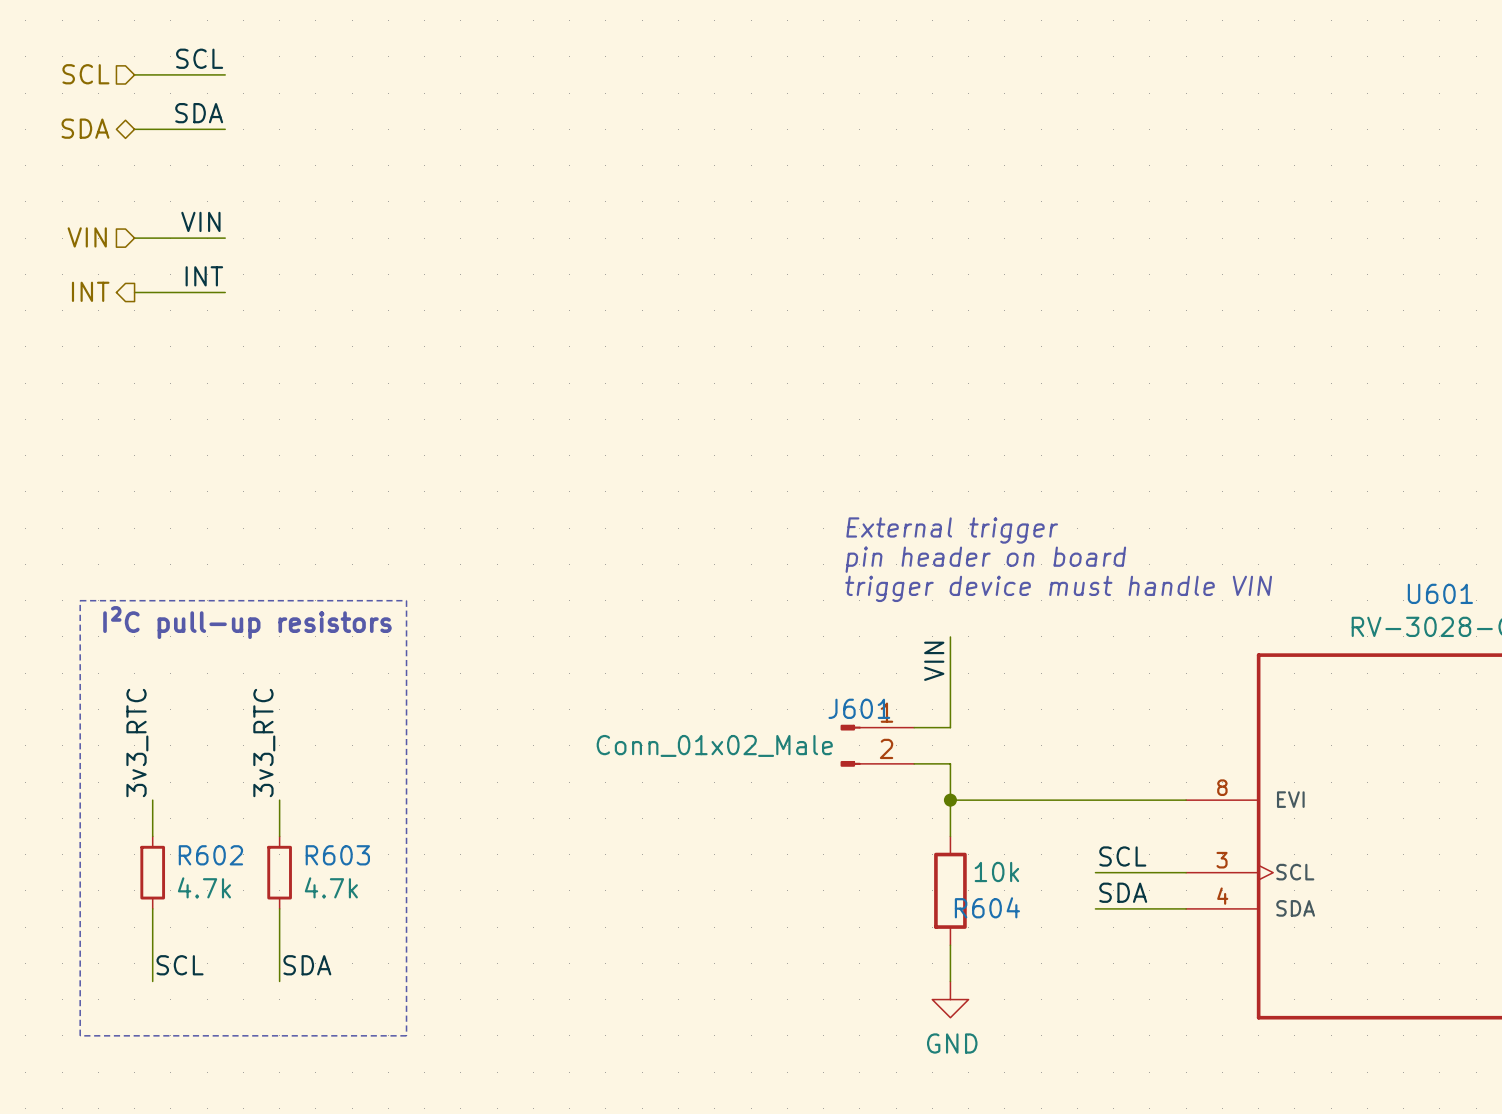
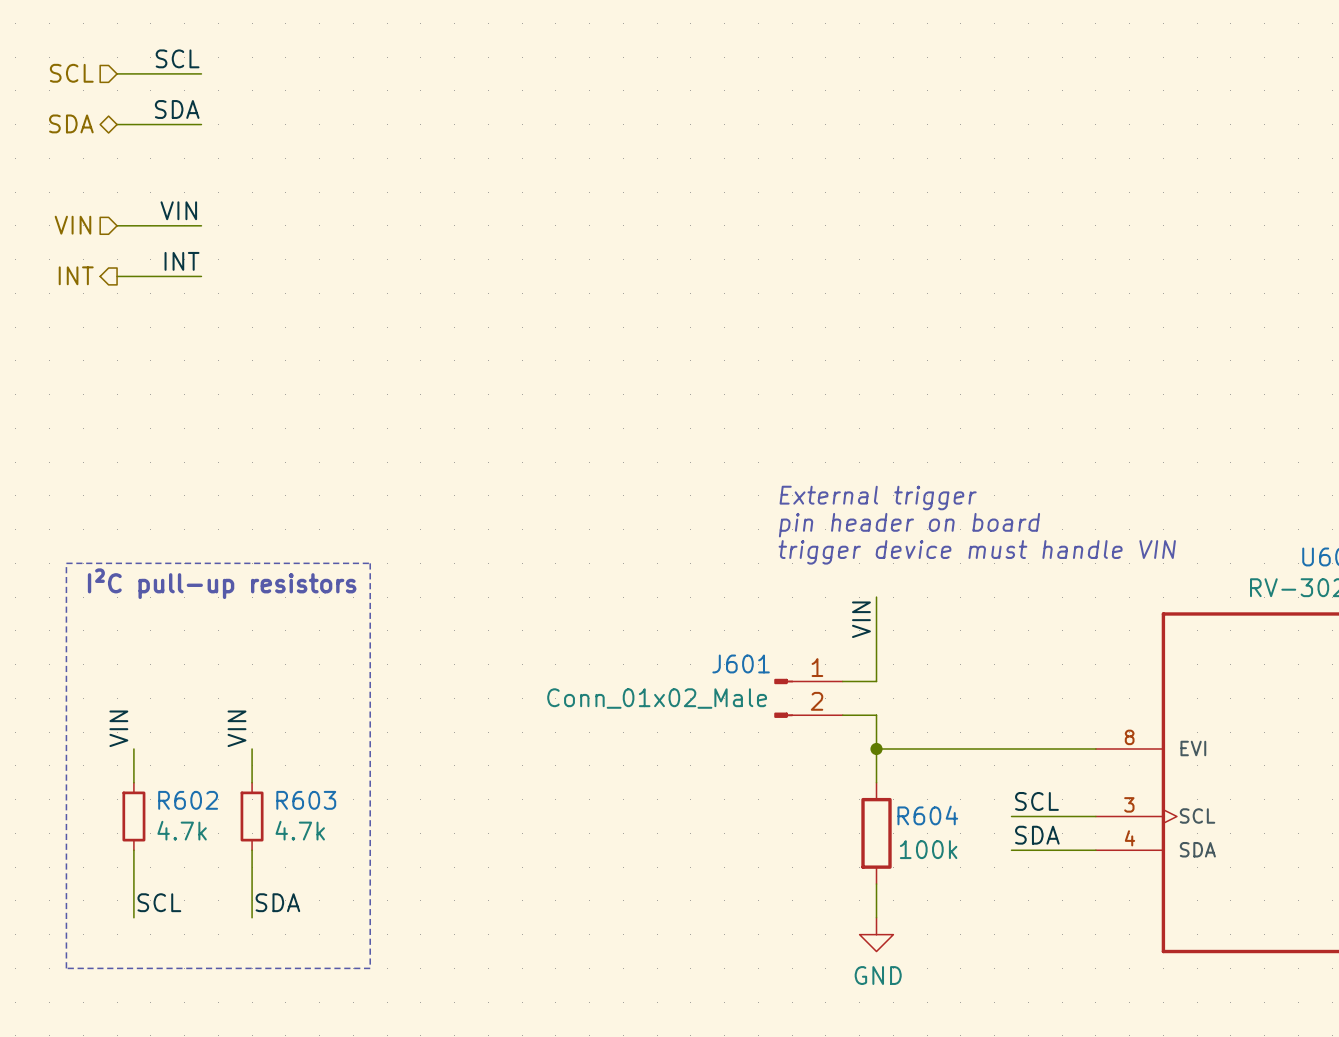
J601 name position: J601 (859, 708) -> J601 (741, 663)
label: 3v3_RTC (137, 743) -> VIN (118, 728)
label: 3v3_RTC (264, 743) -> VIN (237, 728)
R604 value: 10k (996, 871) -> 100k (928, 849)
R604 name position: R604 (987, 907) -> R604 (927, 815)

